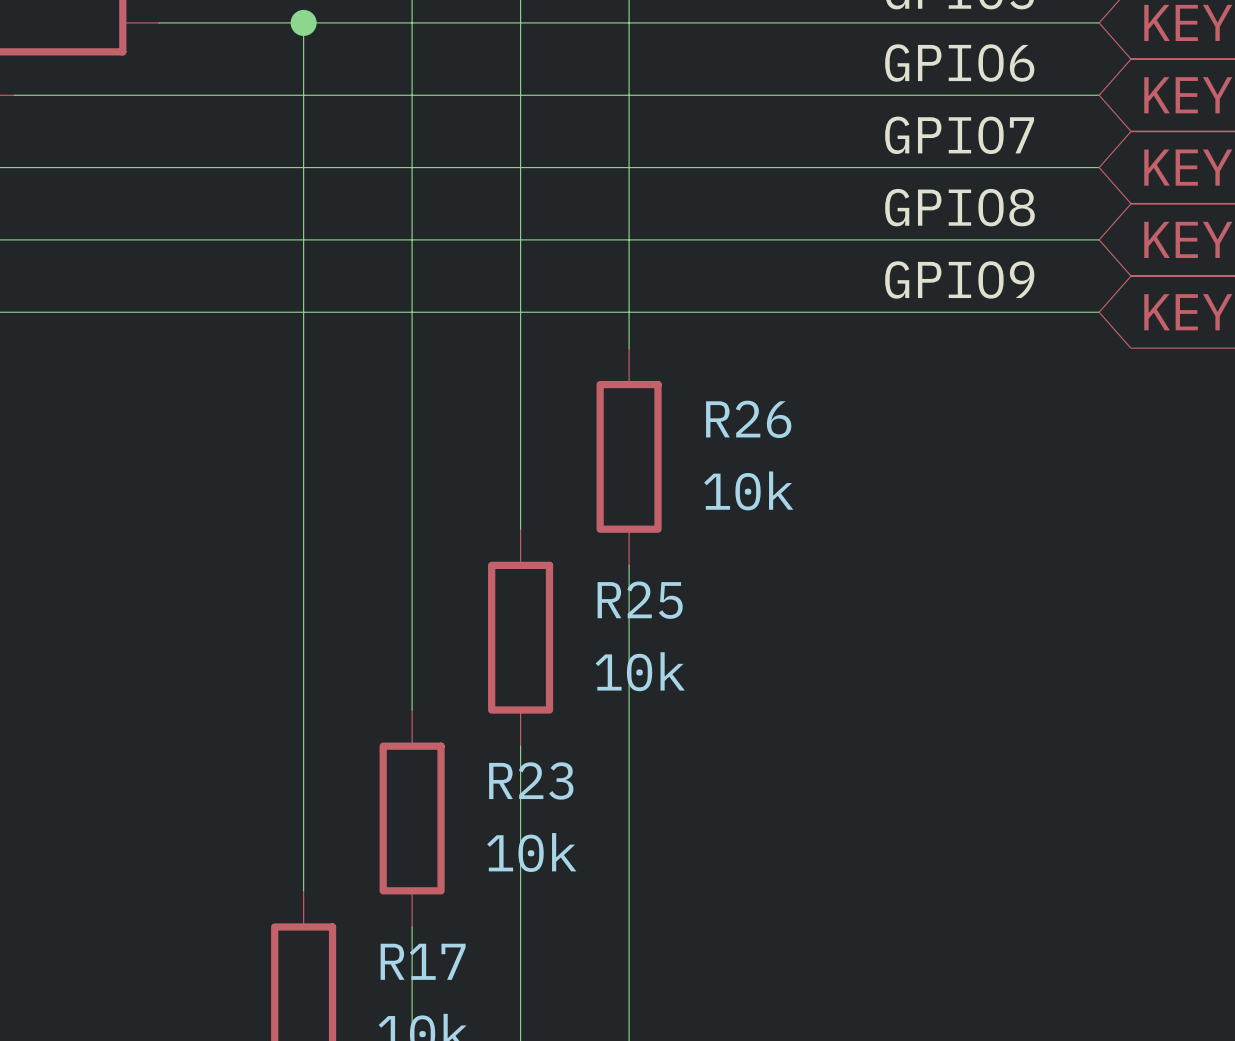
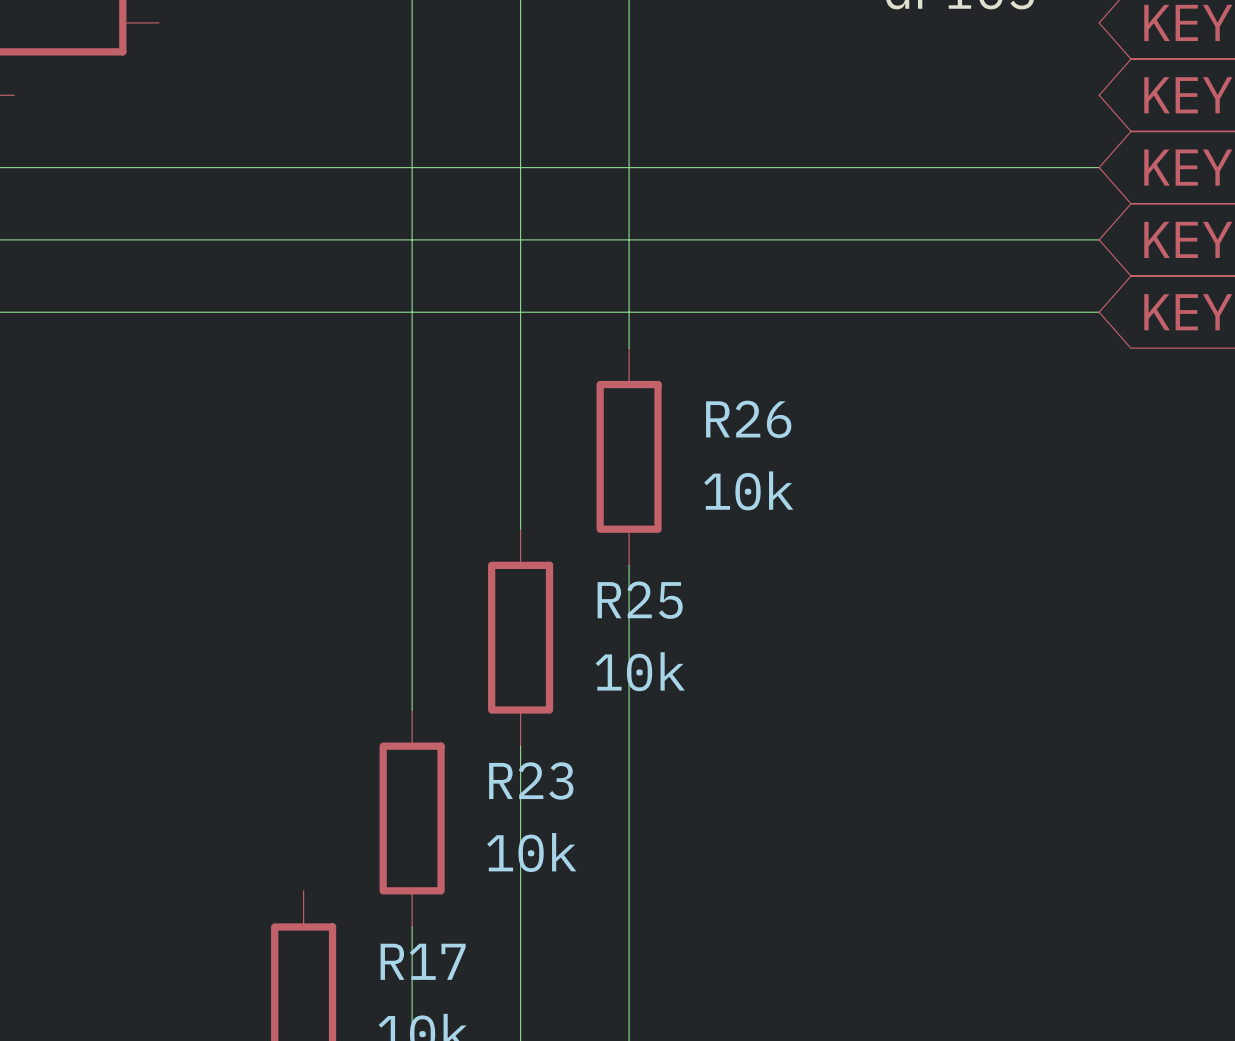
wire: (158, 22) (1099, 22) -> none
wire: (303, 22) (303, 890) -> none
junction: (303, 22) -> none
label: GPIO6 (959, 62) -> none
wire: (14, 95) (1099, 95) -> none
label: GPIO7 (959, 135) -> none
label: GPIO8 (959, 207) -> none
label: GPIO9 (959, 279) -> none

